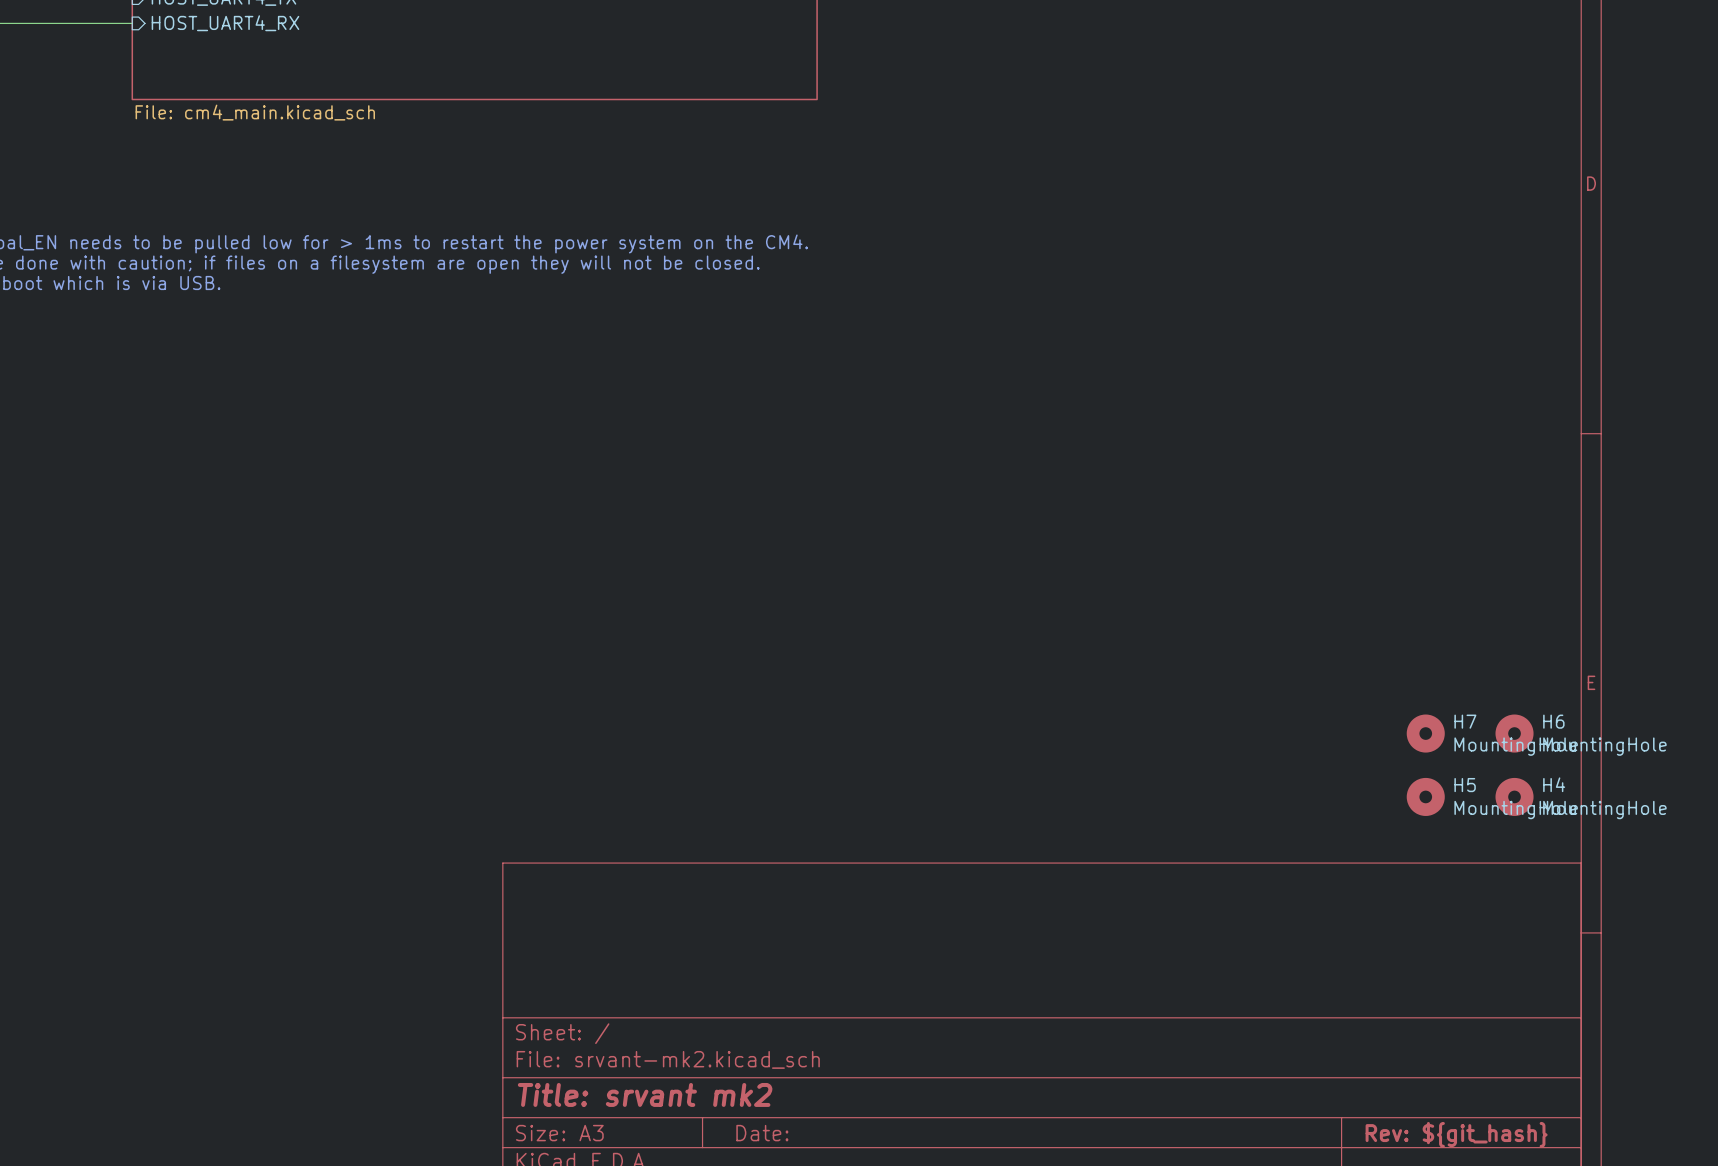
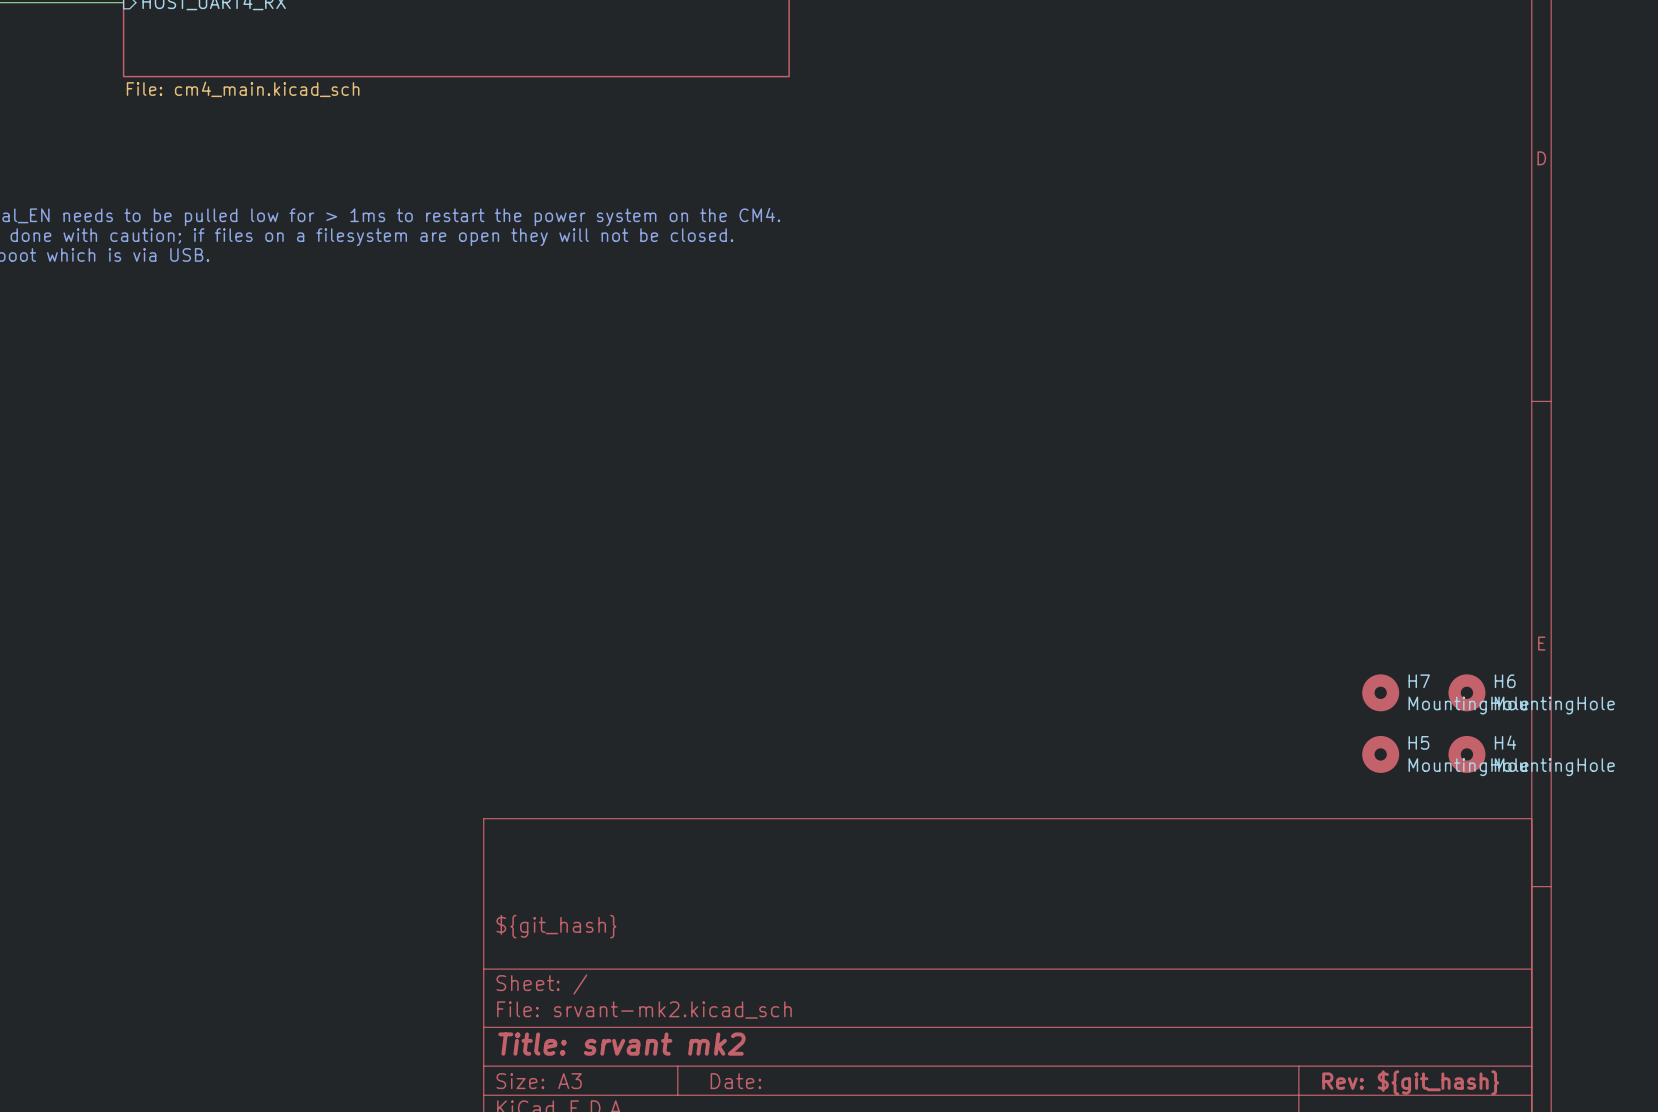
title block: none -> ${git_hash} (556, 926)

